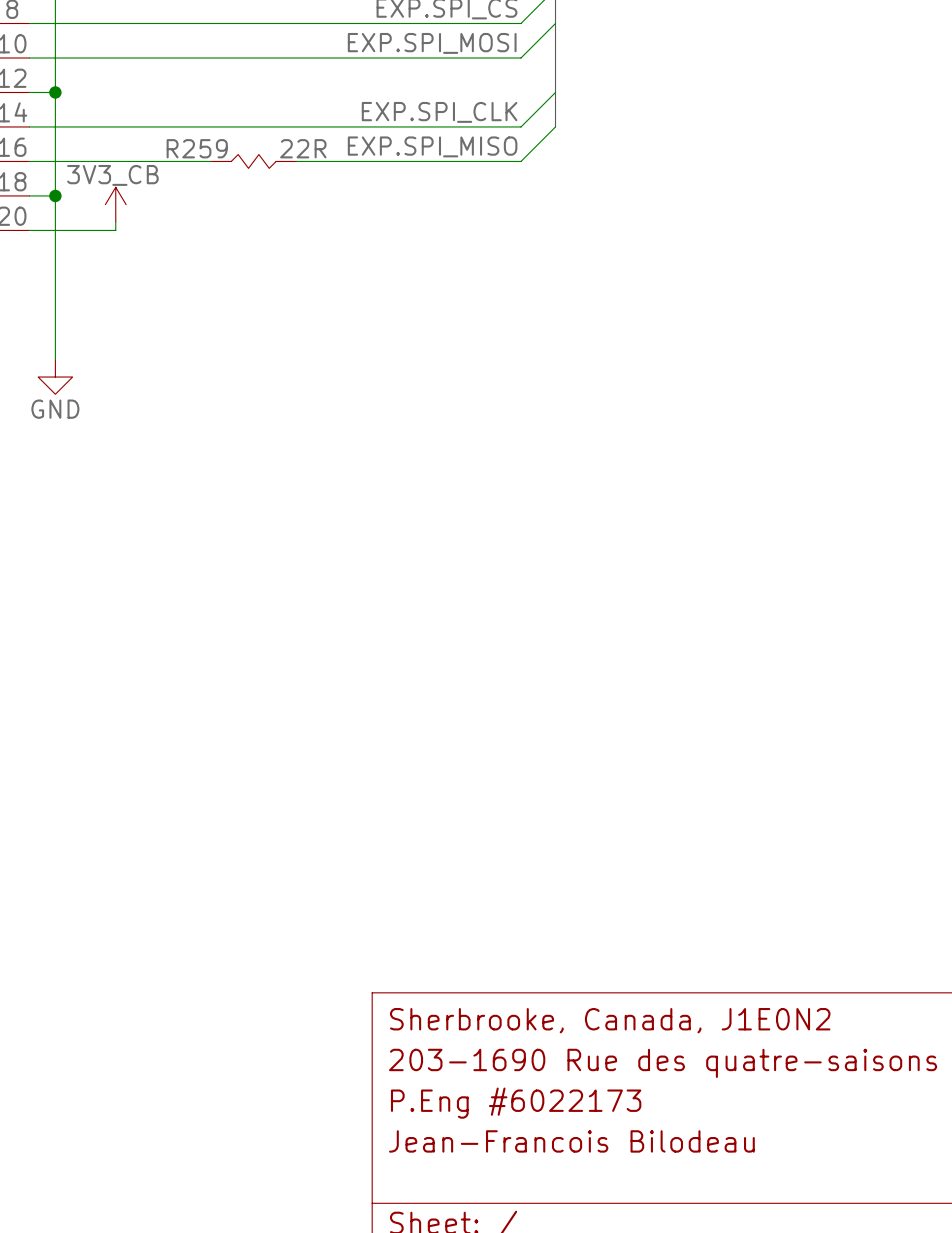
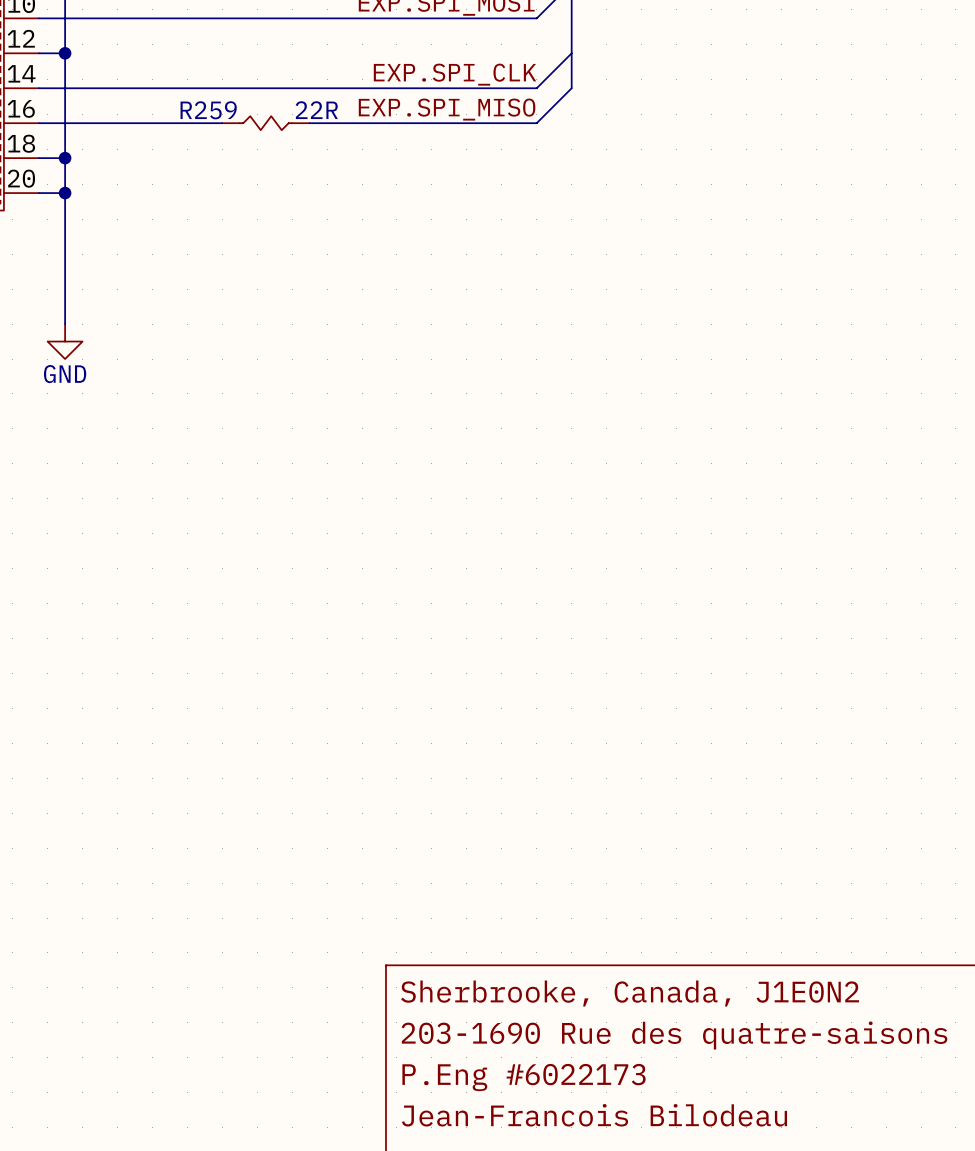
power symbol: 3V3_CB (115, 204) -> none
wire: (115, 221) (115, 230) (55, 230) -> none
junction: none -> (65, 193)

